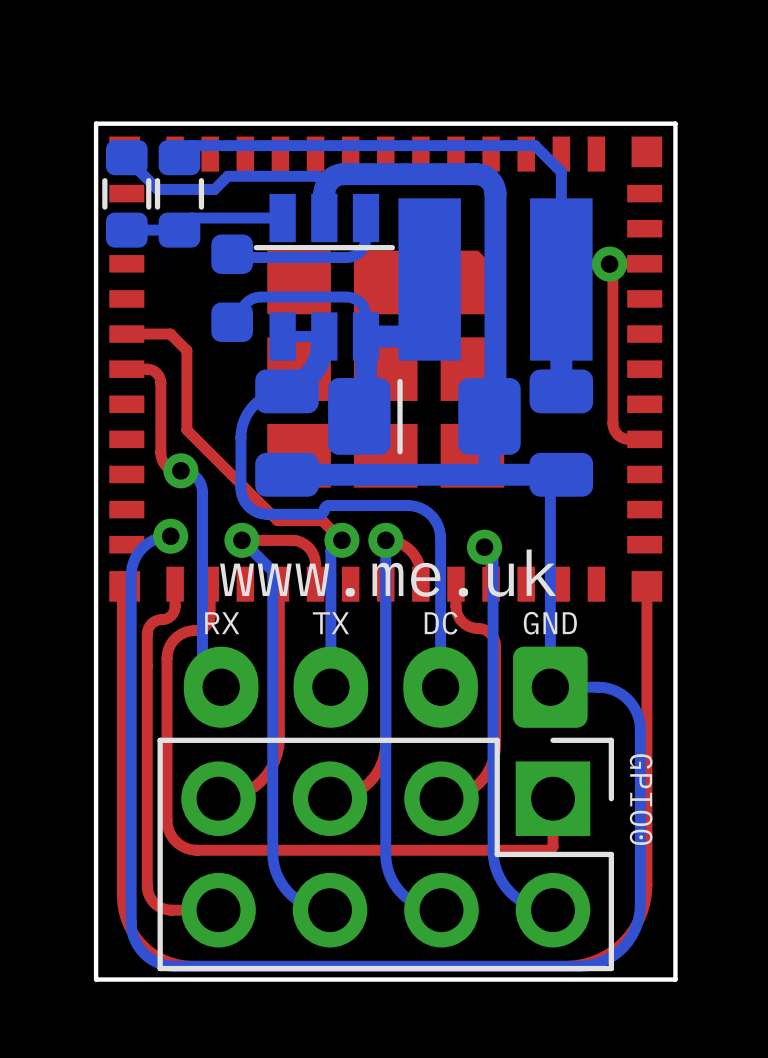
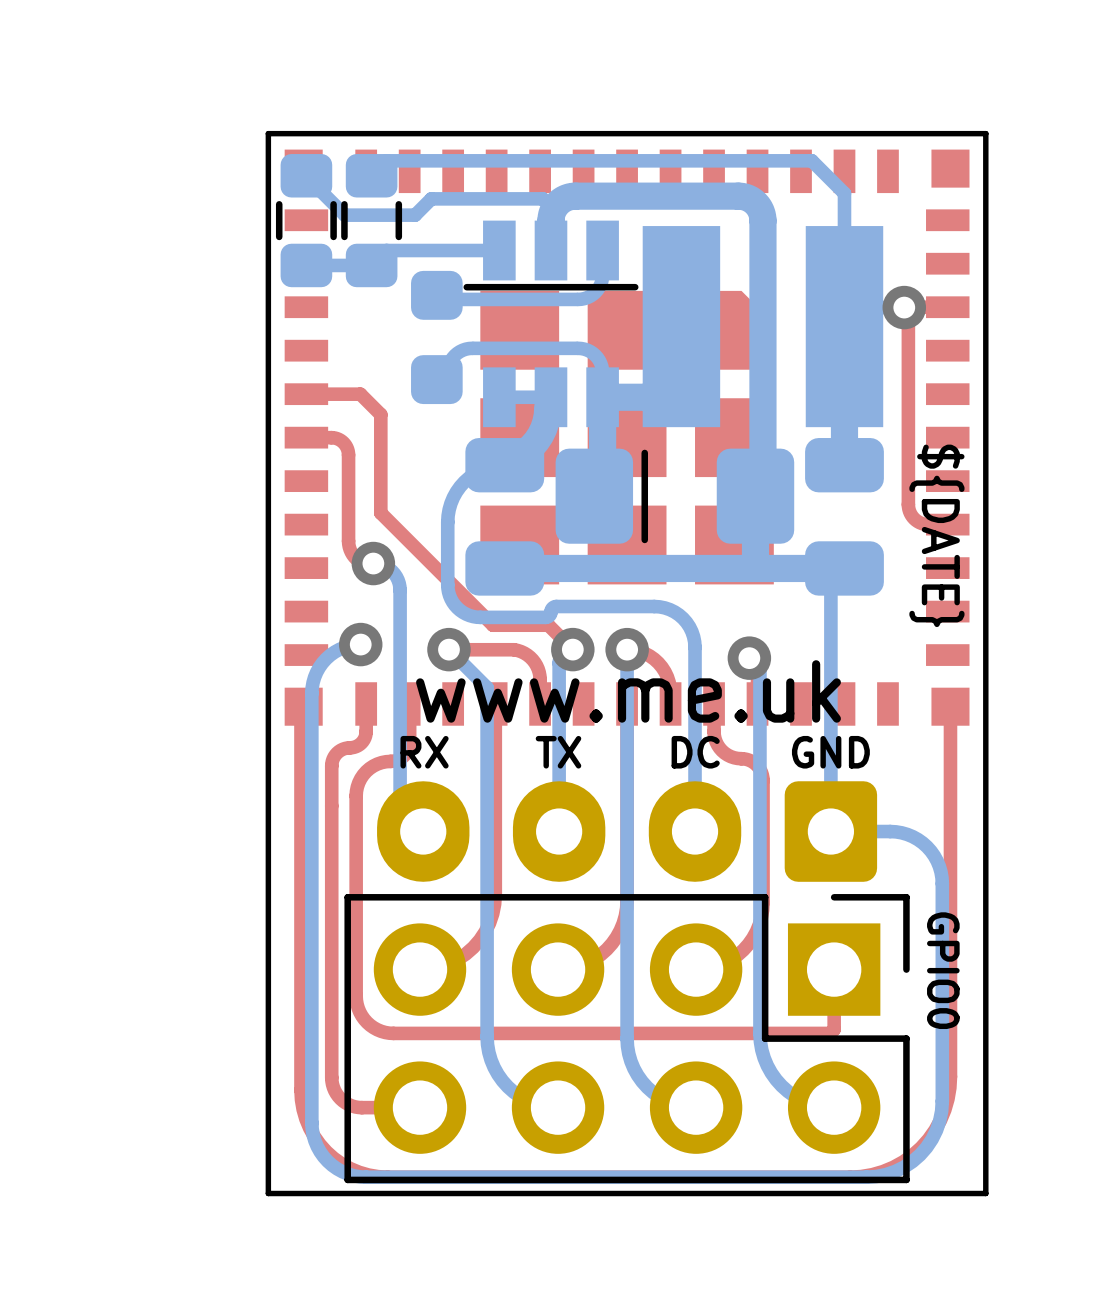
text: none -> ${DATE} (936, 535)

